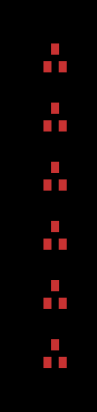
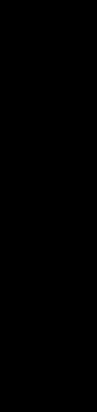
part: (55, 57) -> none
part: (55, 117) -> none
part: (55, 176) -> none
part: (55, 235) -> none
part: (55, 294) -> none
part: (55, 353) -> none

